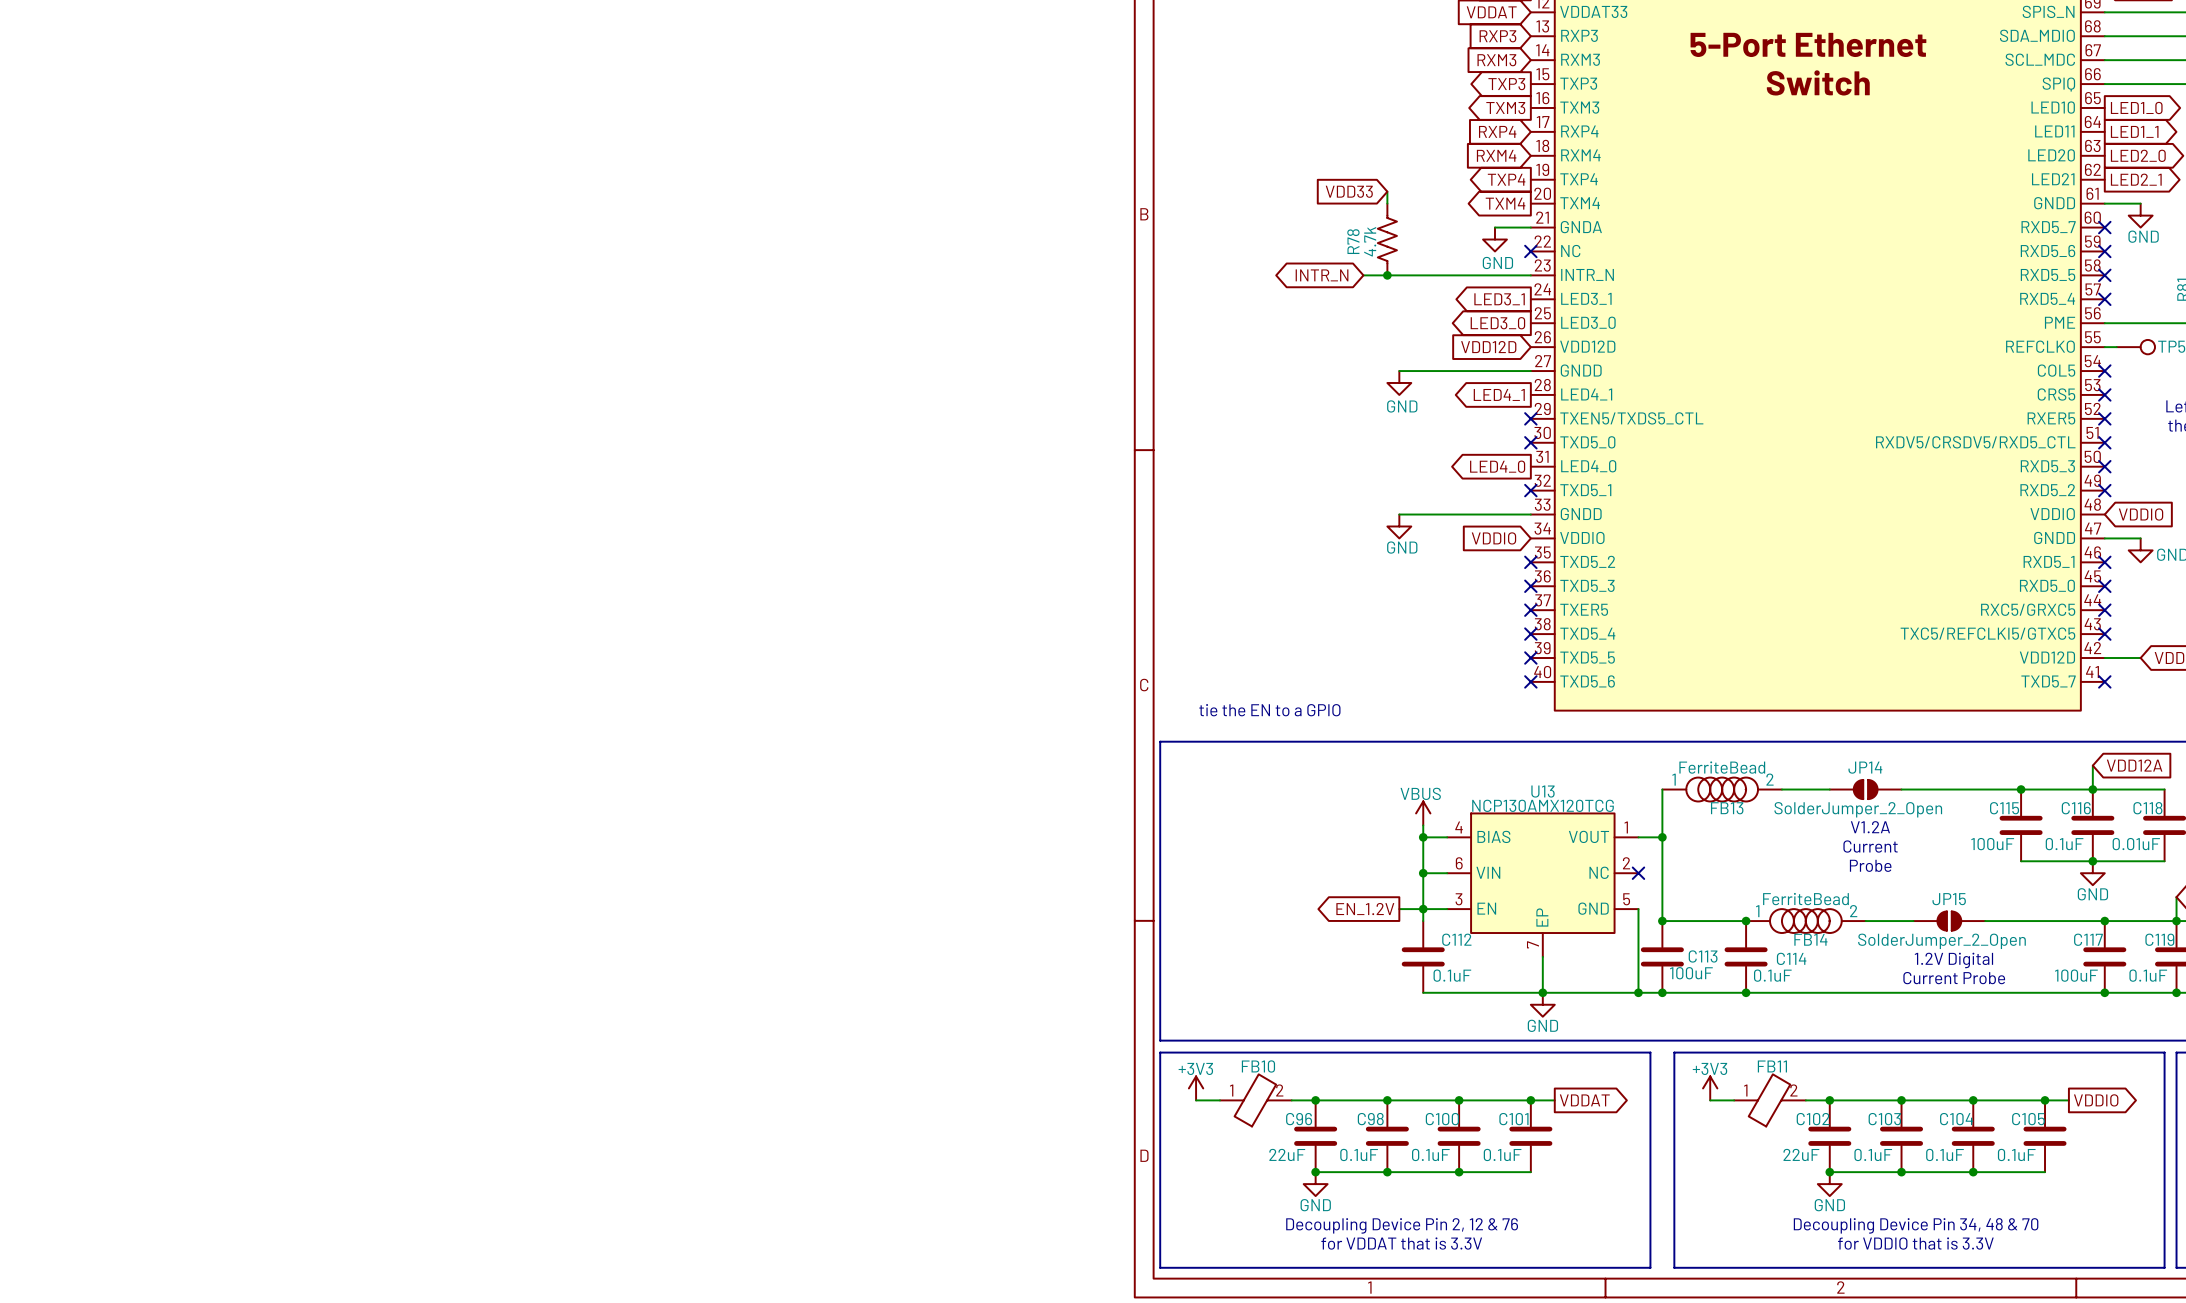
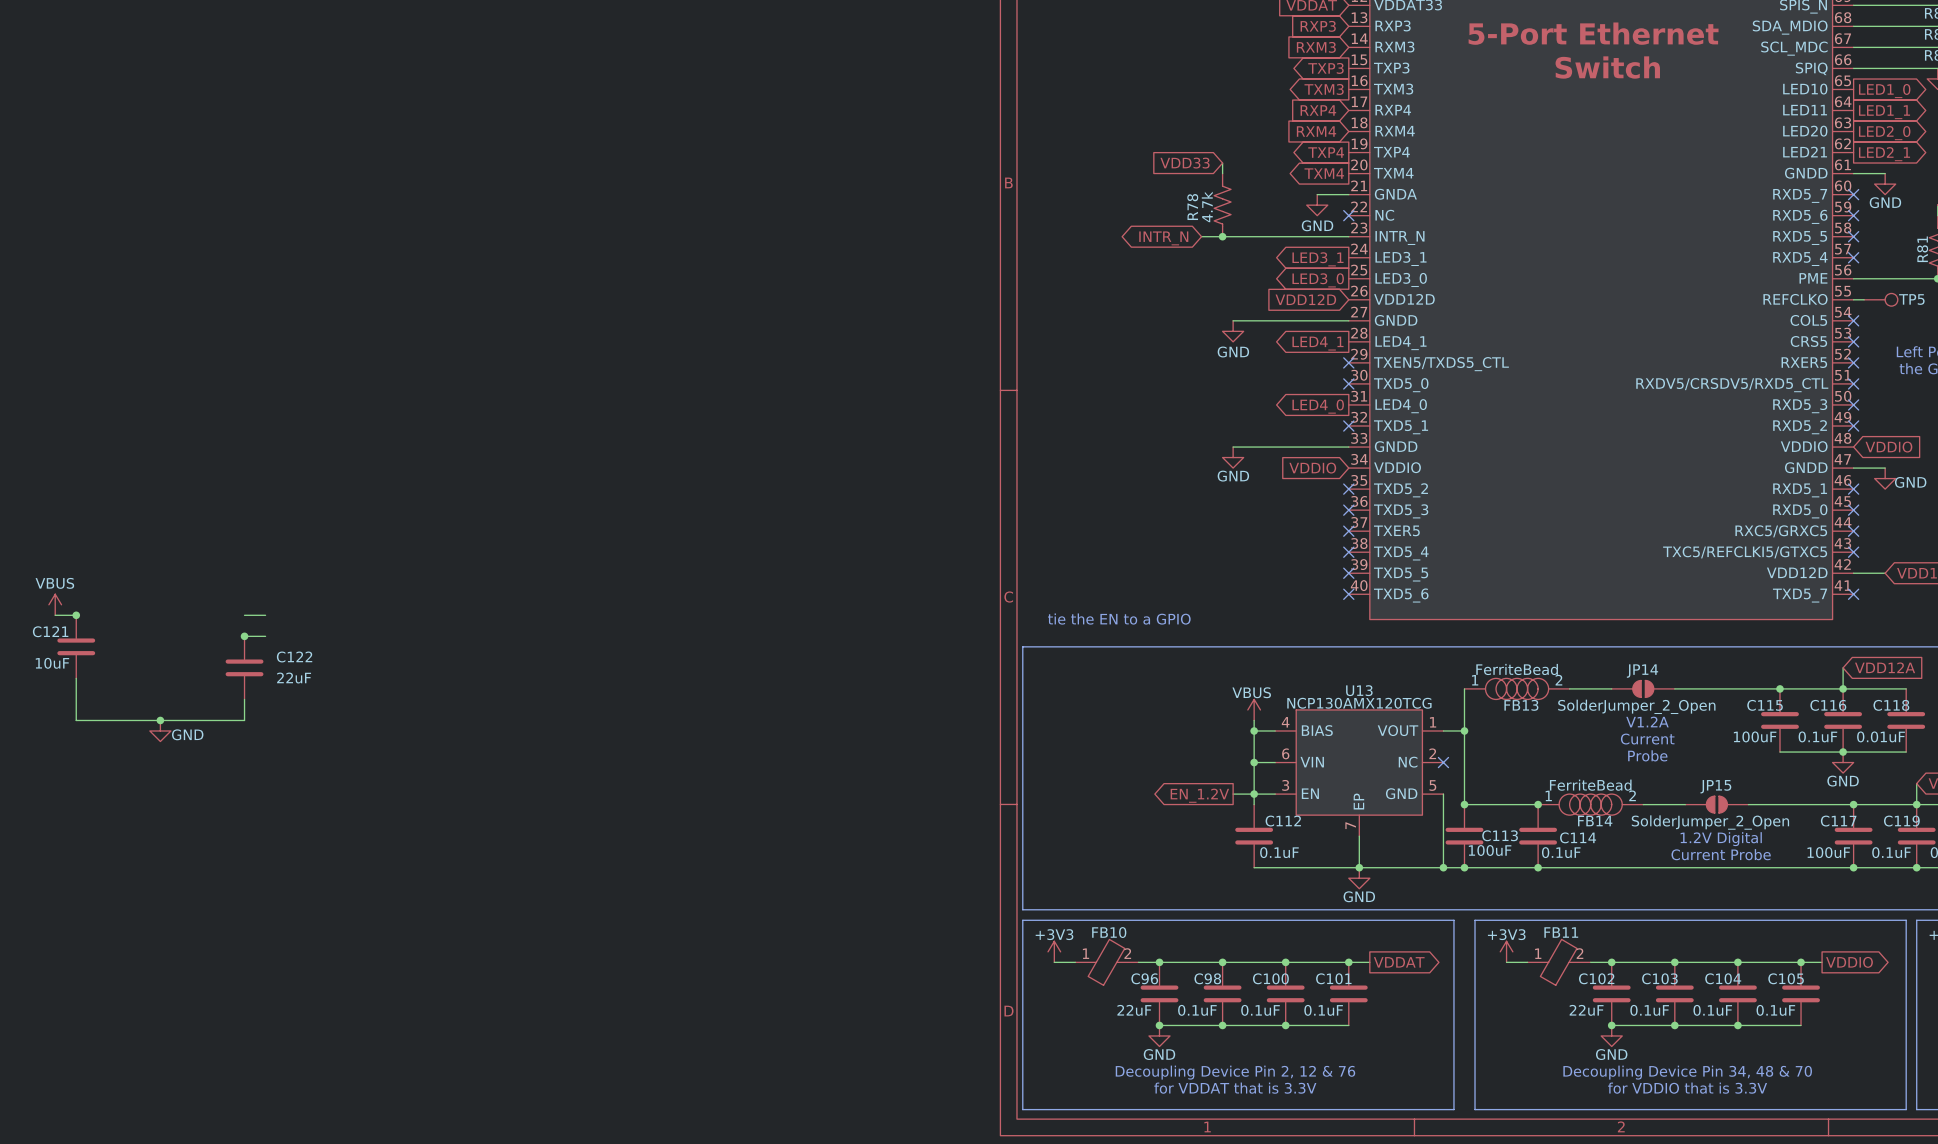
power symbol: none -> VBUS (55, 604)
wire: none -> (55, 615) (76, 615)
junction: none -> (76, 615)
wire: none -> (244, 615) (265, 615)
wire: none -> (244, 636) (265, 636)
junction: none -> (244, 636)
C121: none -> 10uF (76, 646)
C122: none -> 22uF (244, 667)
wire: none -> (76, 678) (76, 720) (244, 720) (244, 699)
junction: none -> (160, 720)
power symbol: none -> GND (160, 730)

